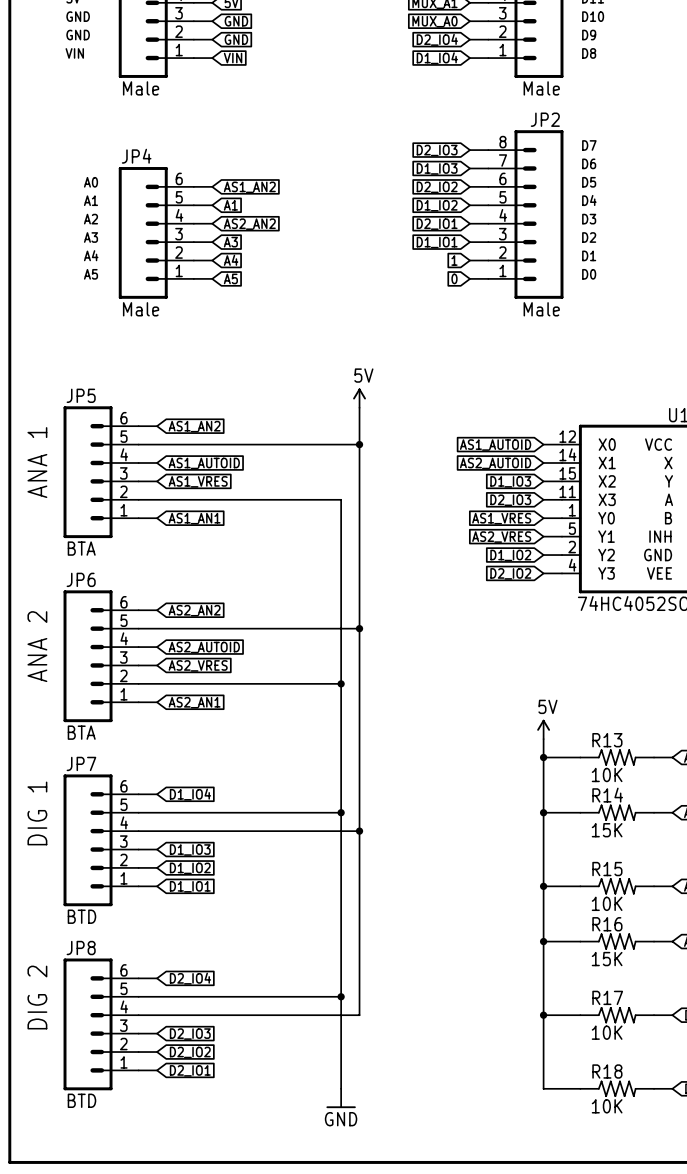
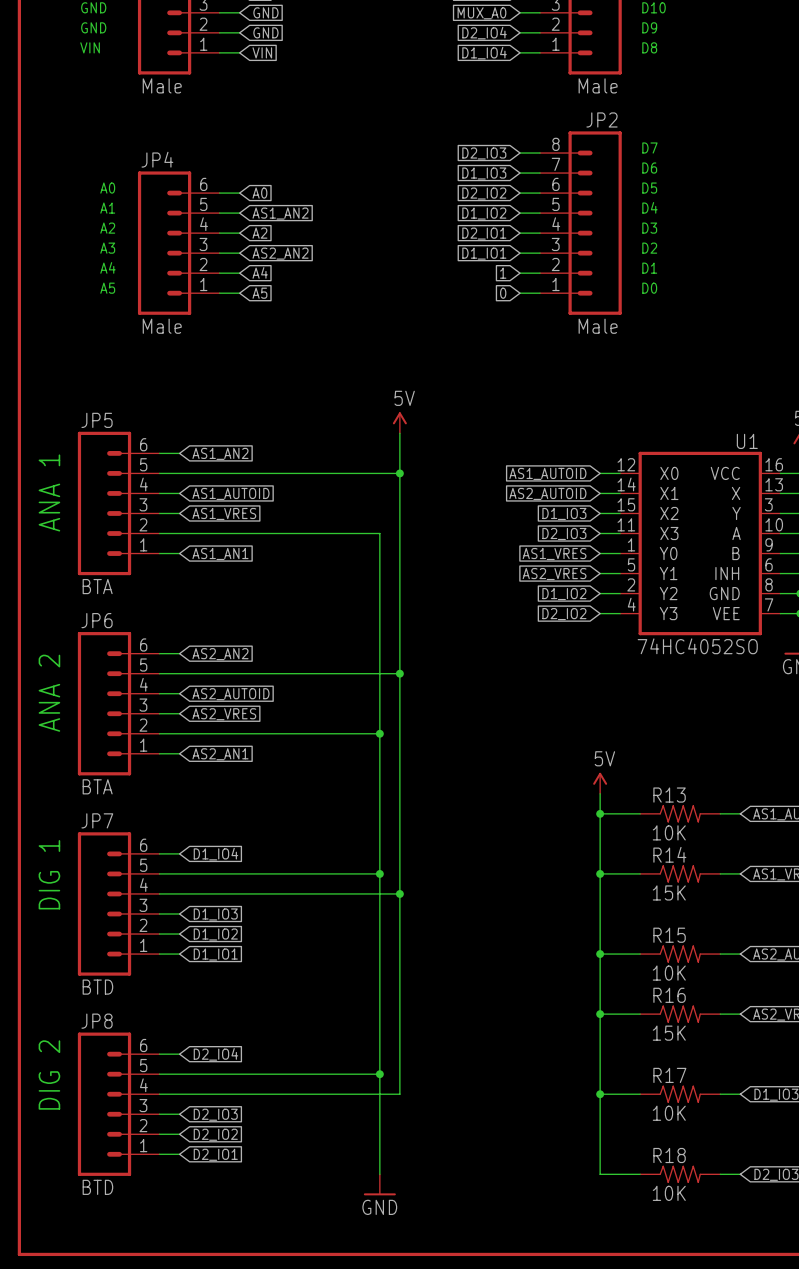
global label: AS1_AN2 (249, 187) -> A0 (259, 193)
global label: A1 (230, 205) -> AS1_AN2 (280, 213)
global label: AS2_AN2 (249, 224) -> A2 (259, 233)
global label: A3 (230, 242) -> AS2_AN2 (280, 253)

